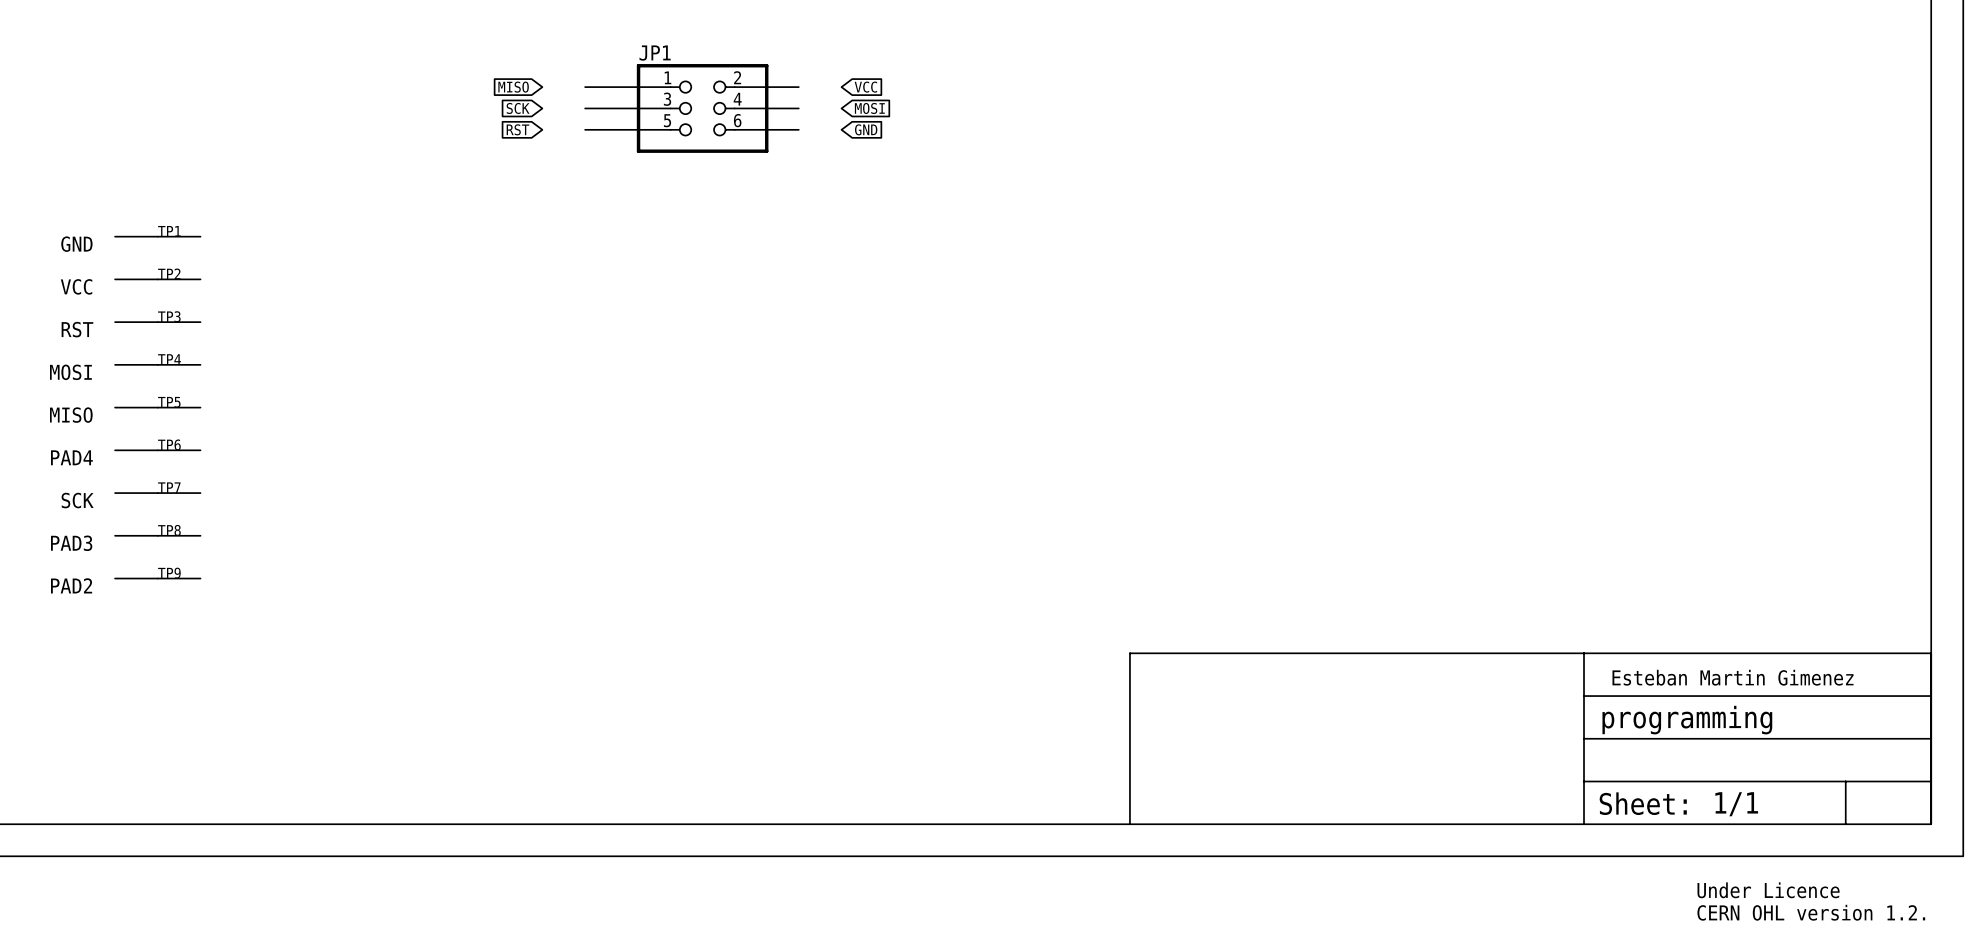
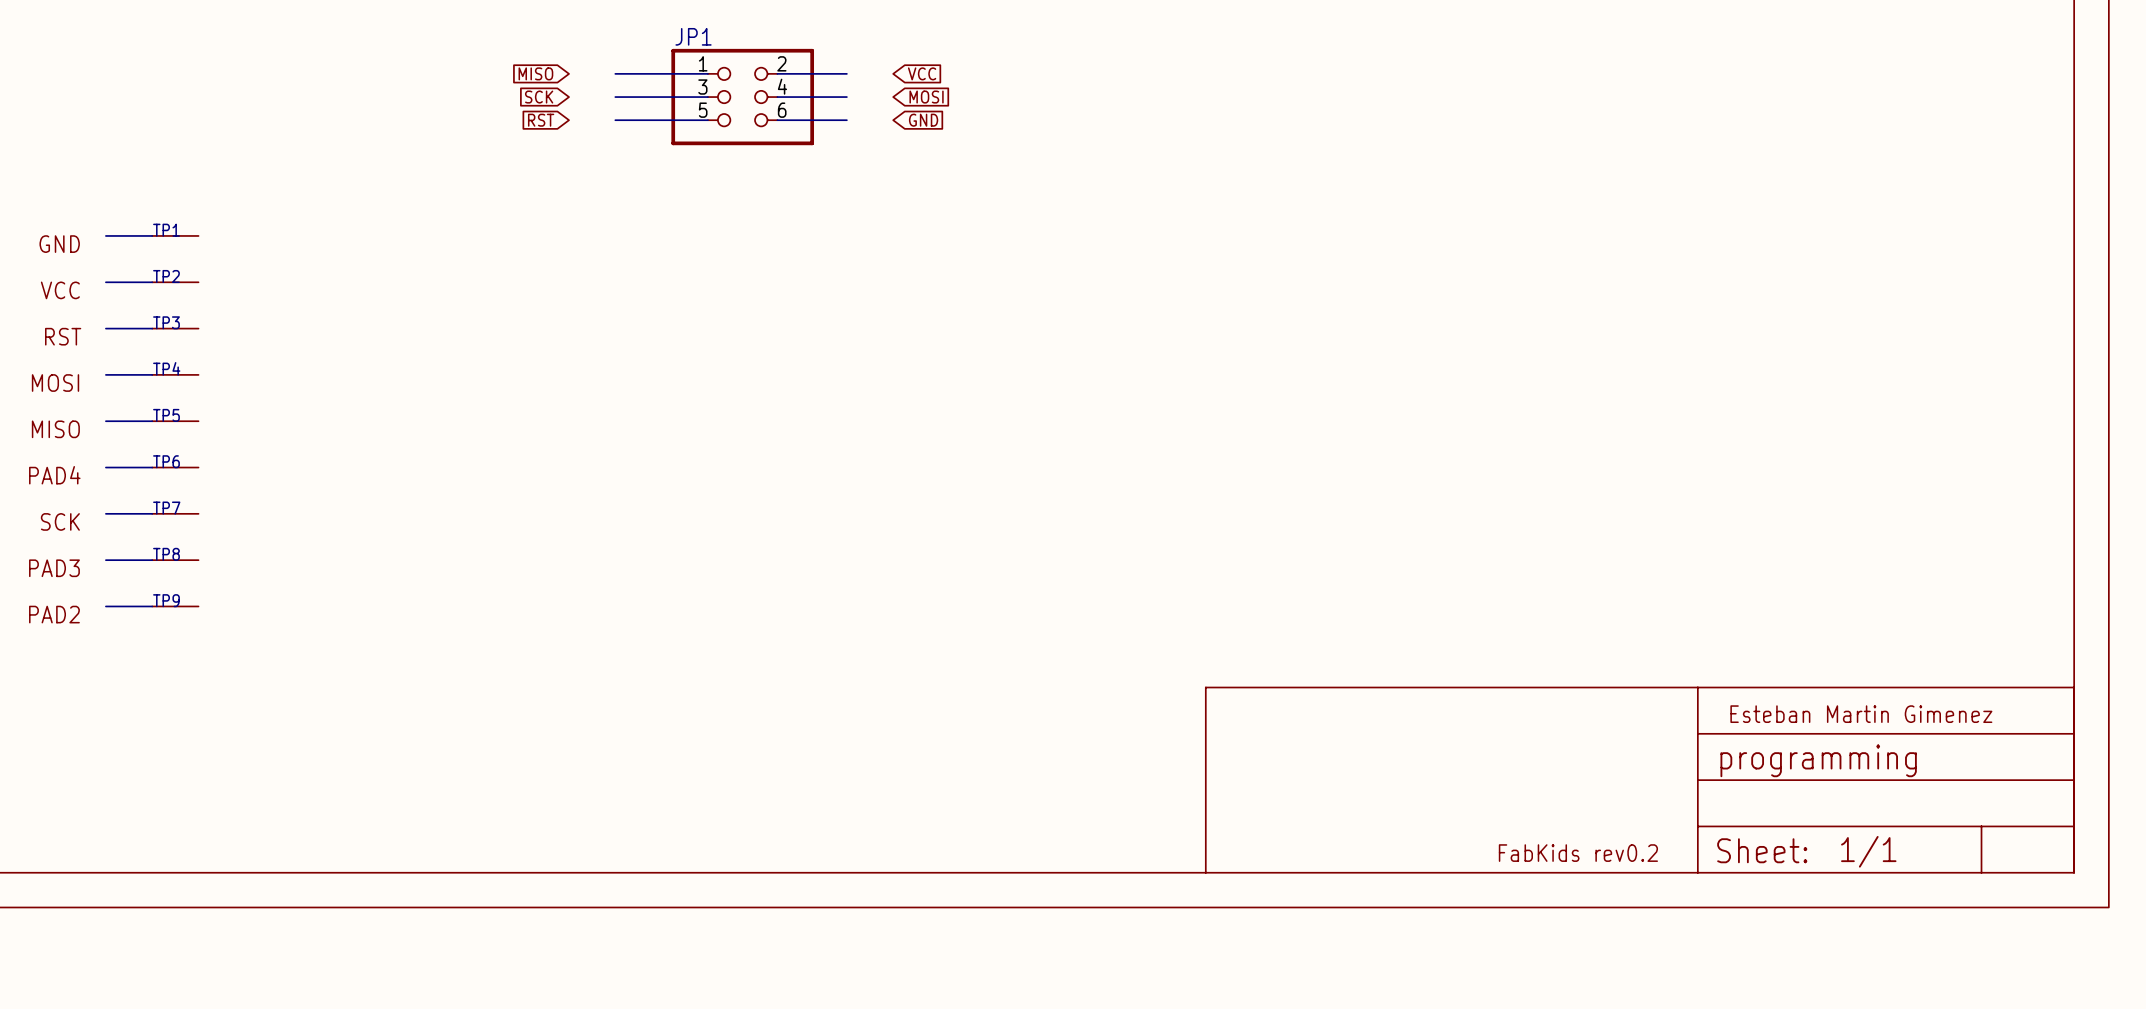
text: none -> FabKids rev0.2 (1578, 853)
text: Under Licence (1768, 890) -> none
text: CERN OHL version 1.2. (1811, 912) -> none

